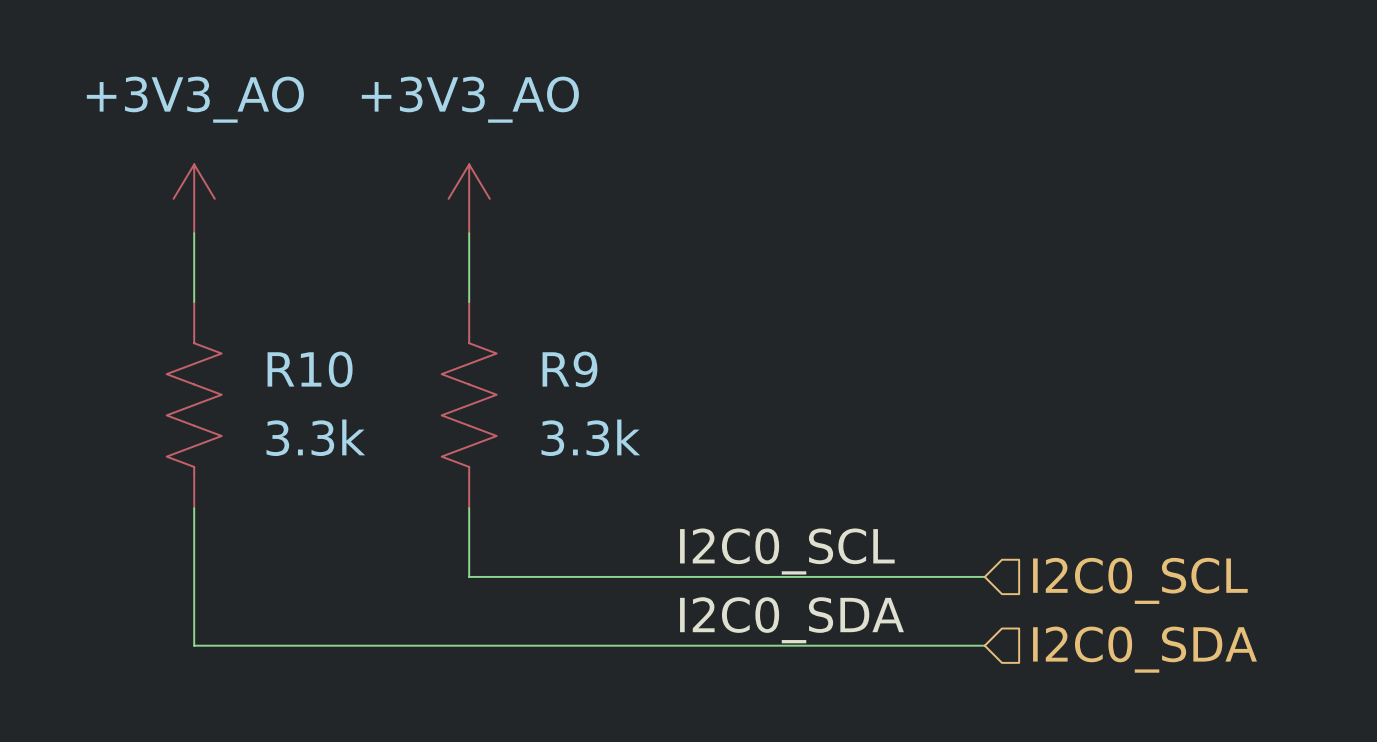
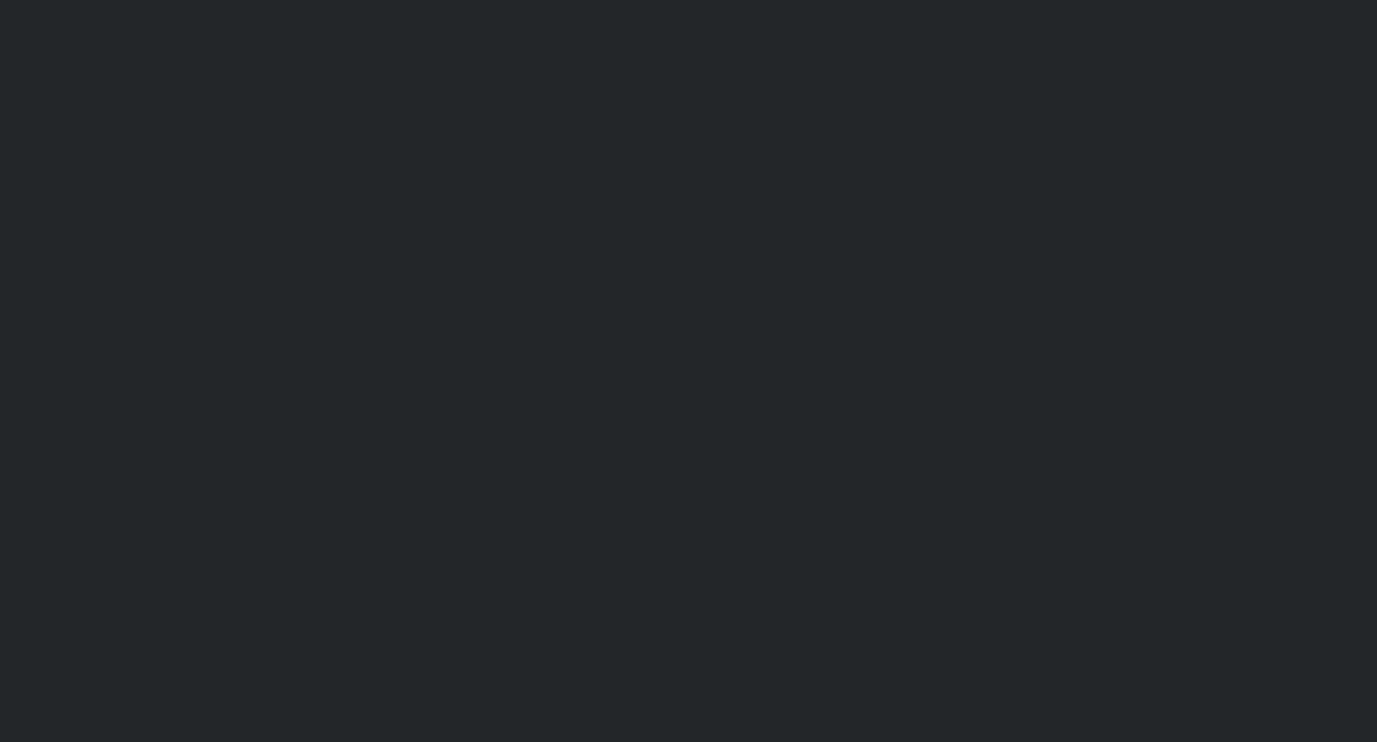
power symbol: +3V3_AO (194, 198) -> none
power symbol: +3V3_AO (469, 198) -> none
wire: (194, 233) (194, 301) -> none
wire: (469, 233) (469, 301) -> none
R10: 3.3k (194, 405) -> none
R9: 3.3k (469, 405) -> none
wire: (194, 508) (194, 645) (984, 645) -> none
wire: (469, 508) (469, 576) (984, 576) -> none
label: I2C0_SCL (787, 551) -> none
hierarchical label: I2C0_SCL (1140, 580) -> none
label: I2C0_SDA (791, 620) -> none
hierarchical label: I2C0_SDA (1144, 649) -> none

